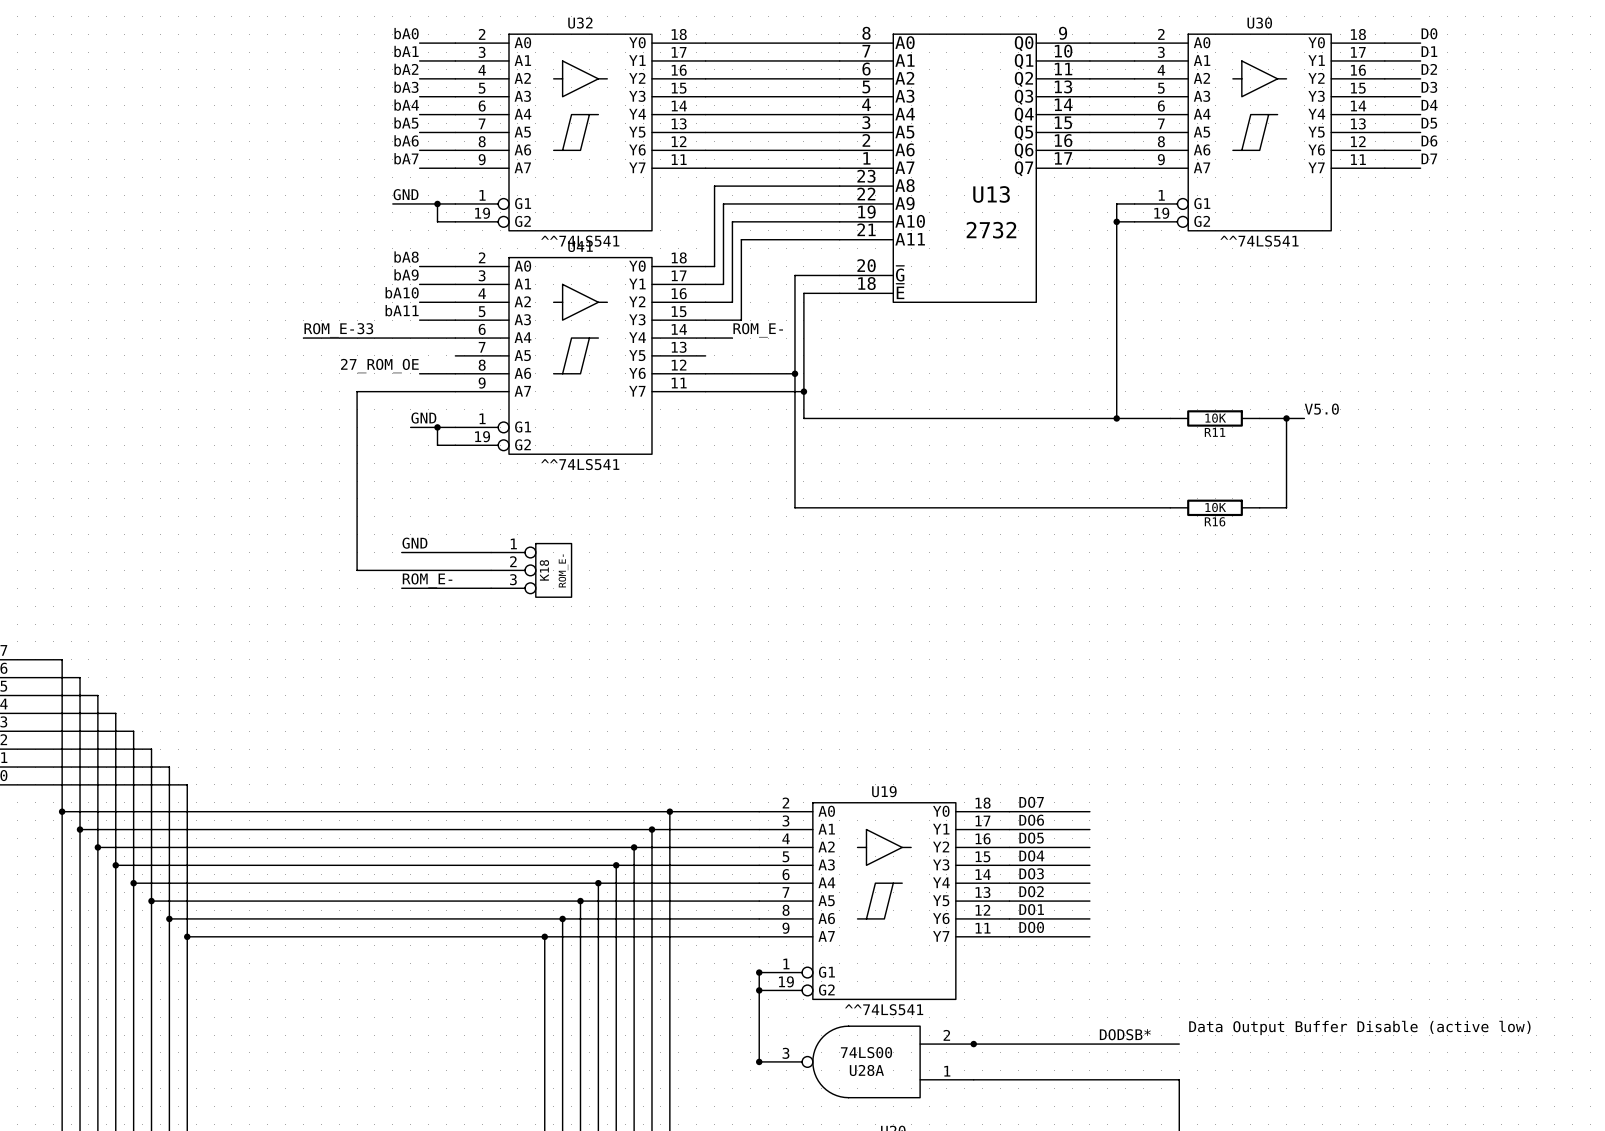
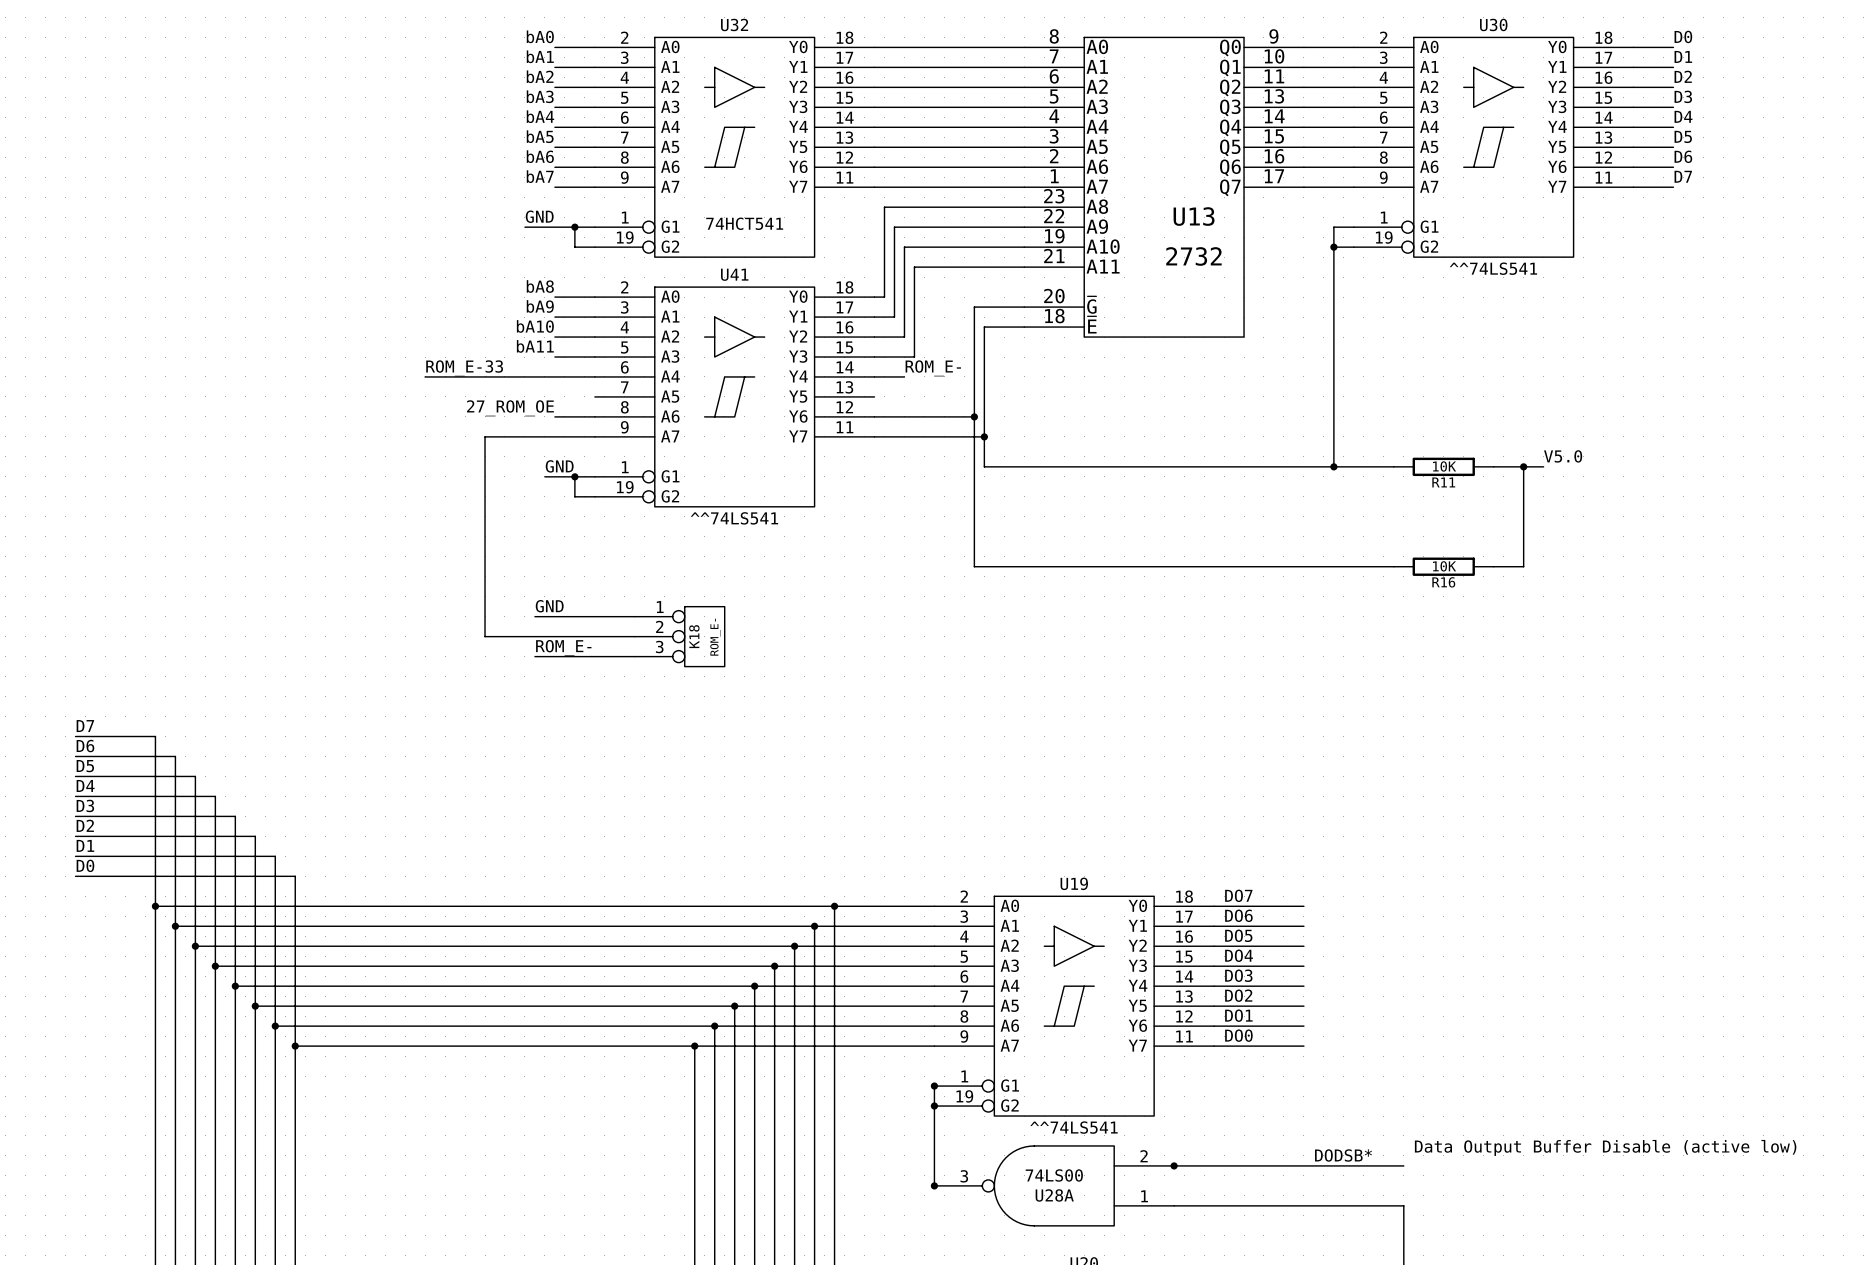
U32 value: ^^74LS541 (580, 241) -> 74HCT541 (744, 223)

